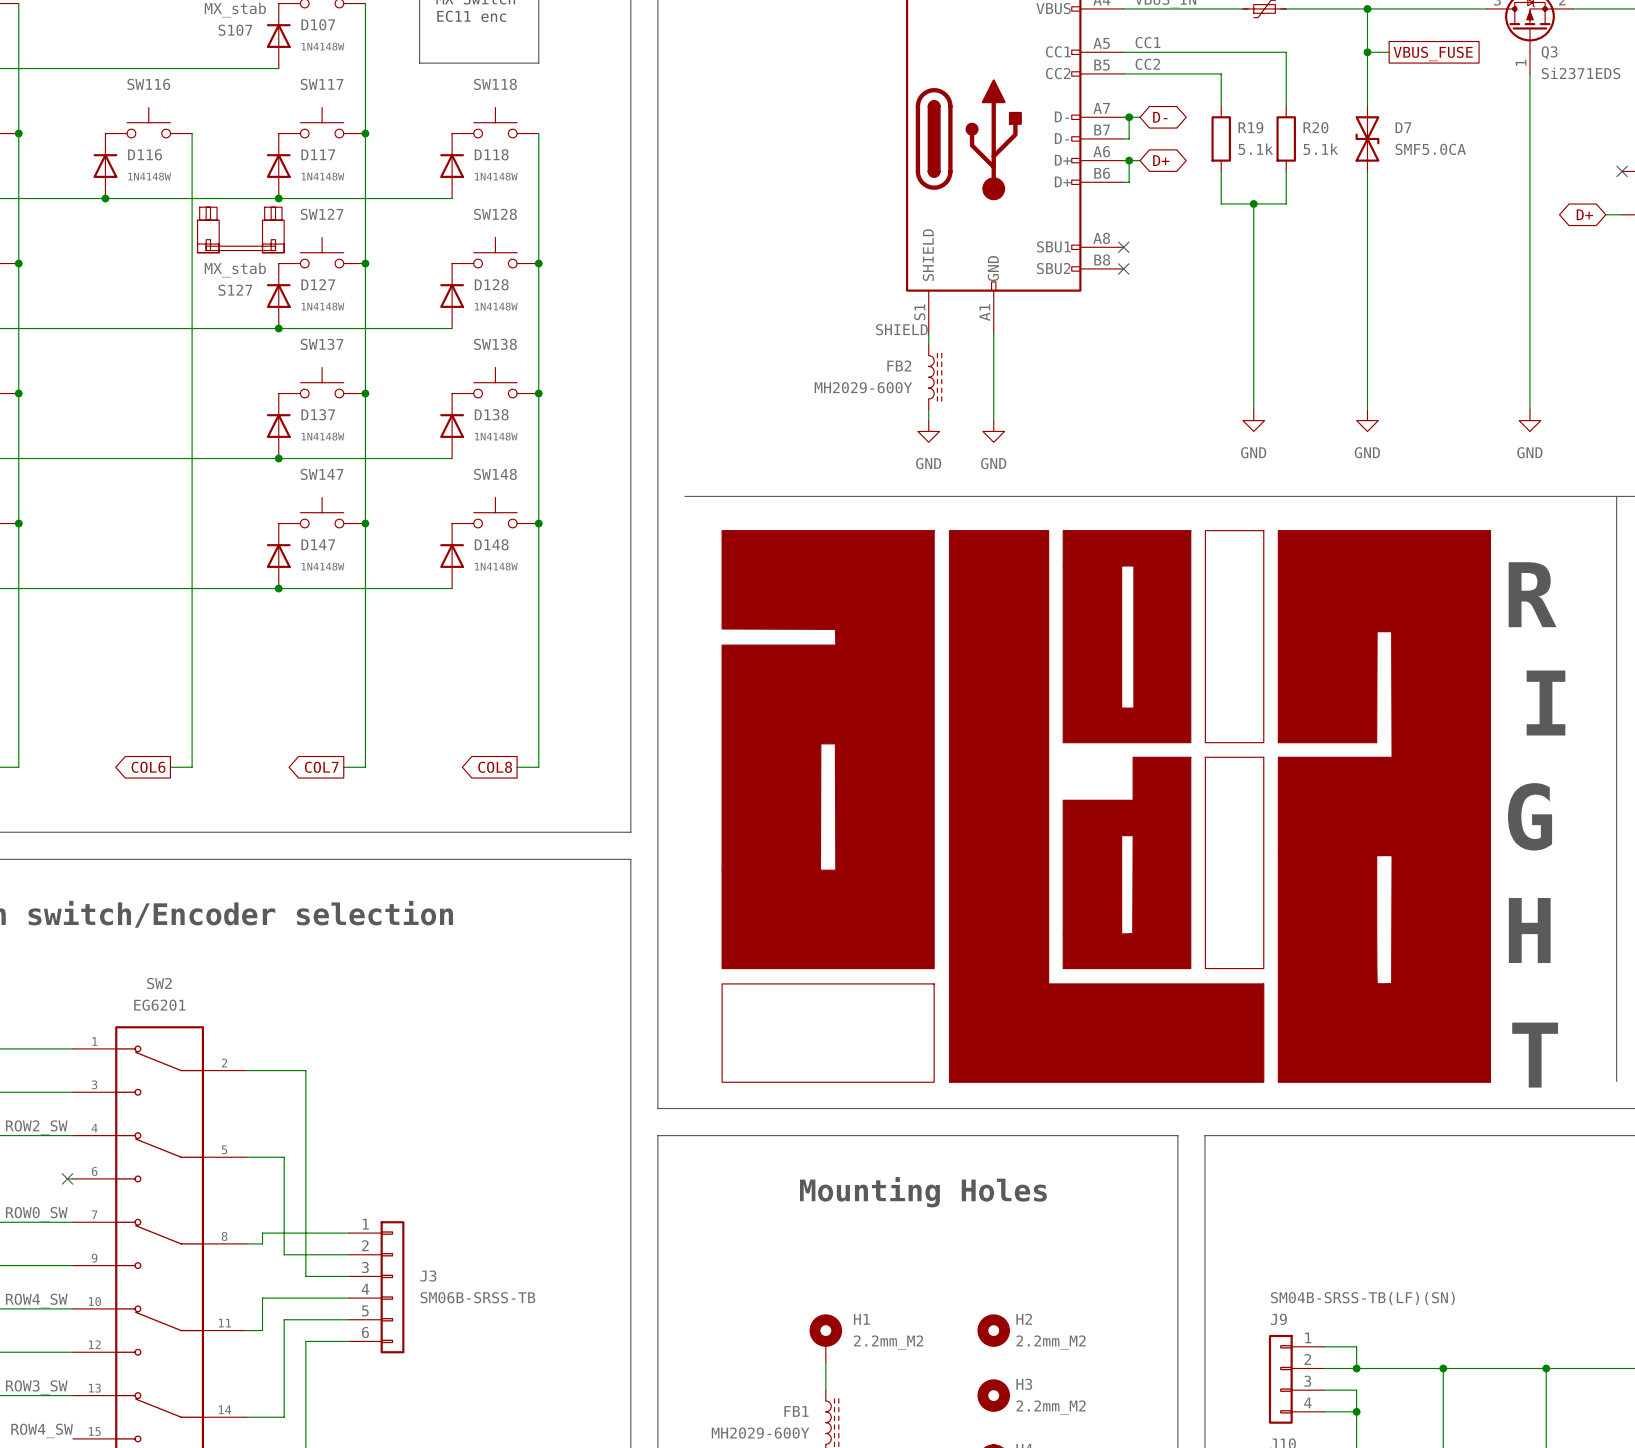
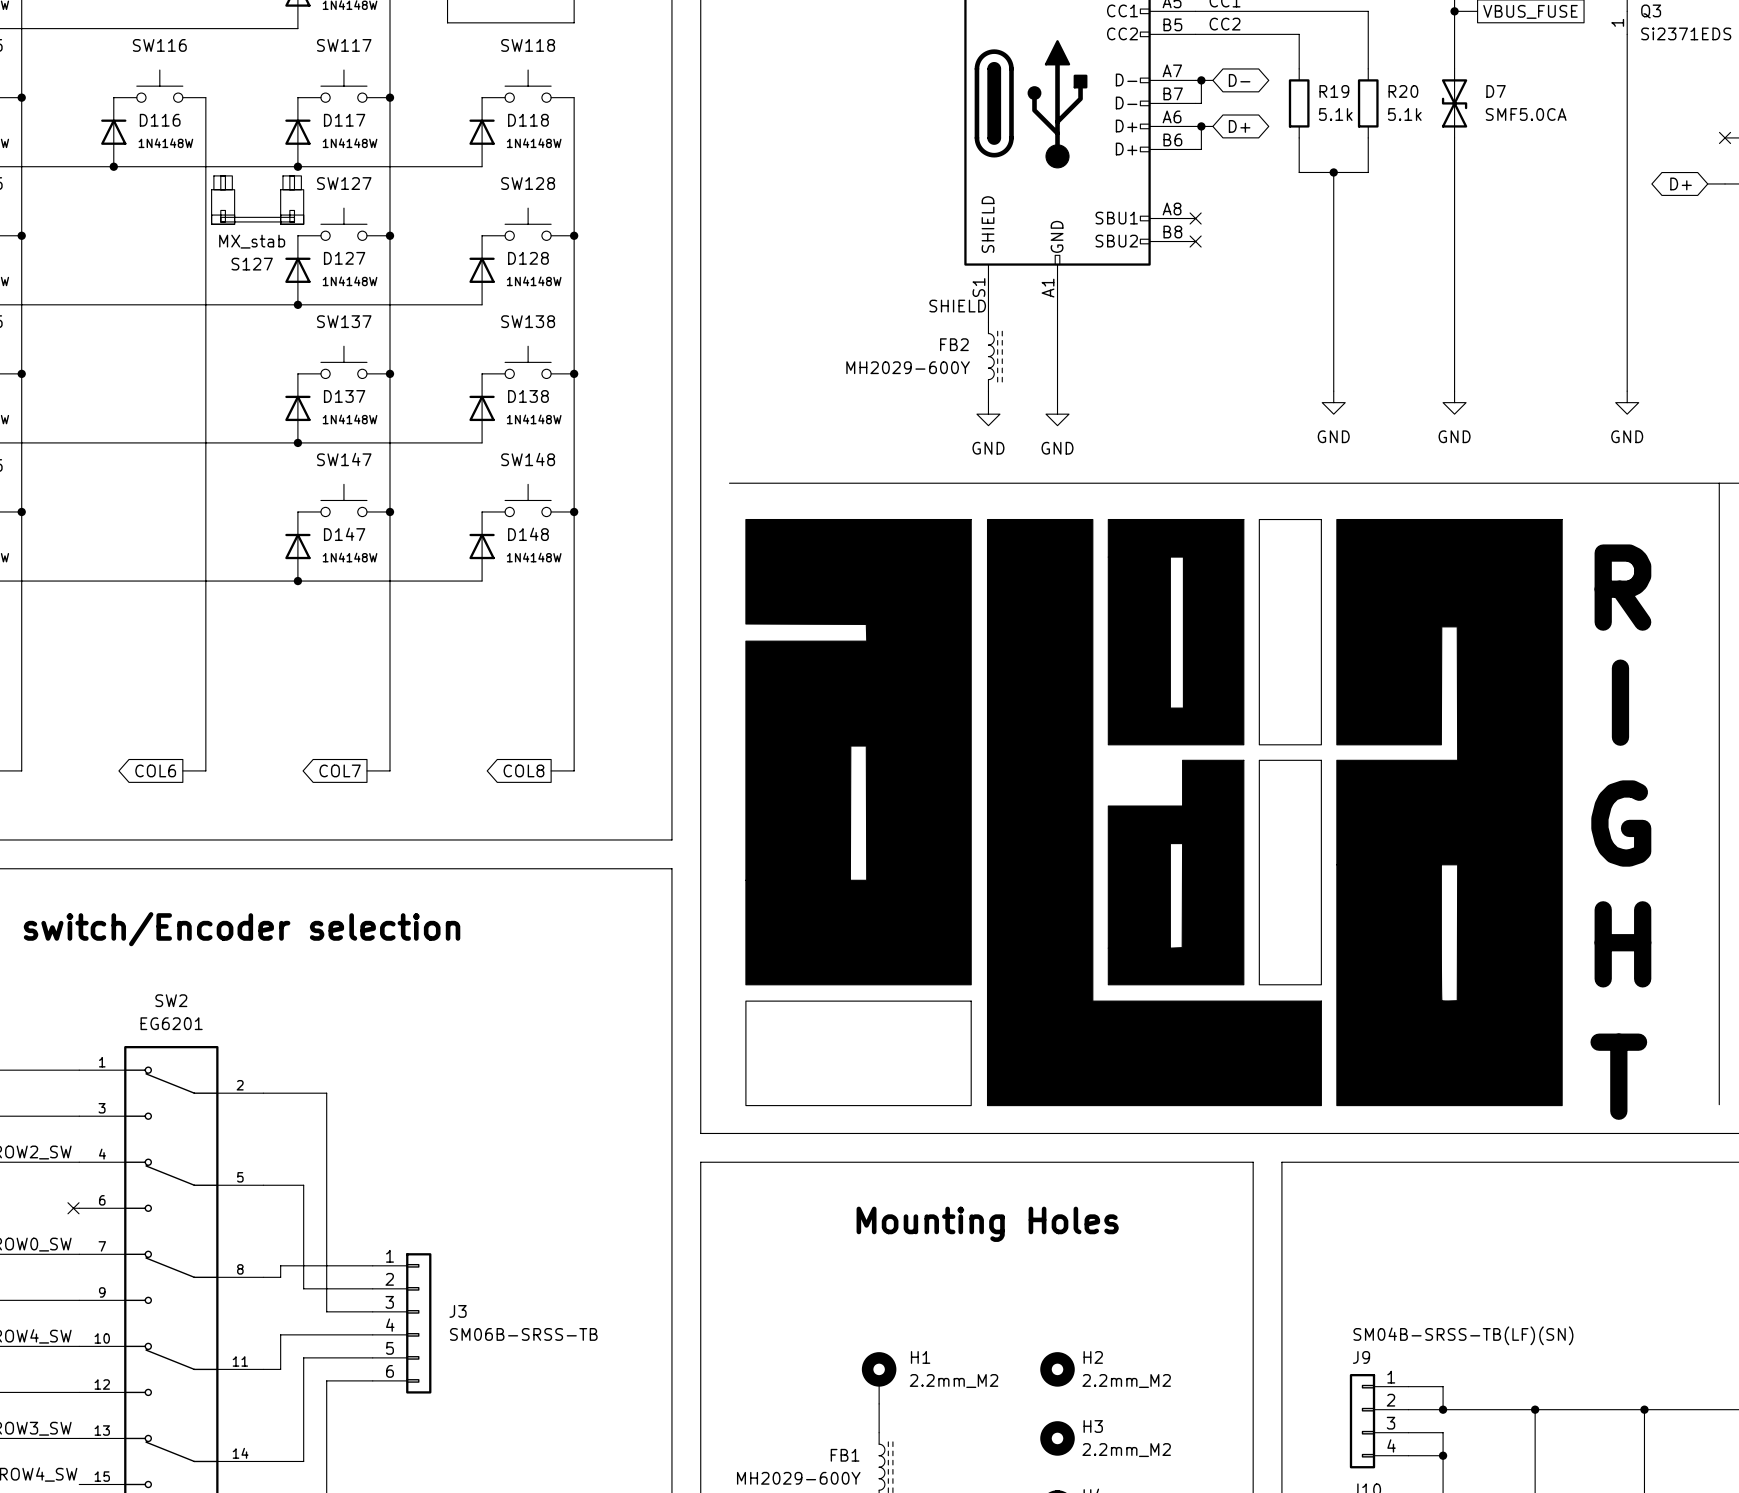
text position: R (1532, 594) -> R (1622, 587)
text position: I (1545, 703) -> I (1620, 702)
part position: (1106, 806) -> (1154, 812)
text position: G (1530, 816) -> G (1621, 823)
text position: H (1529, 930) -> H (1622, 944)
text position: T (1535, 1055) -> T (1618, 1076)

